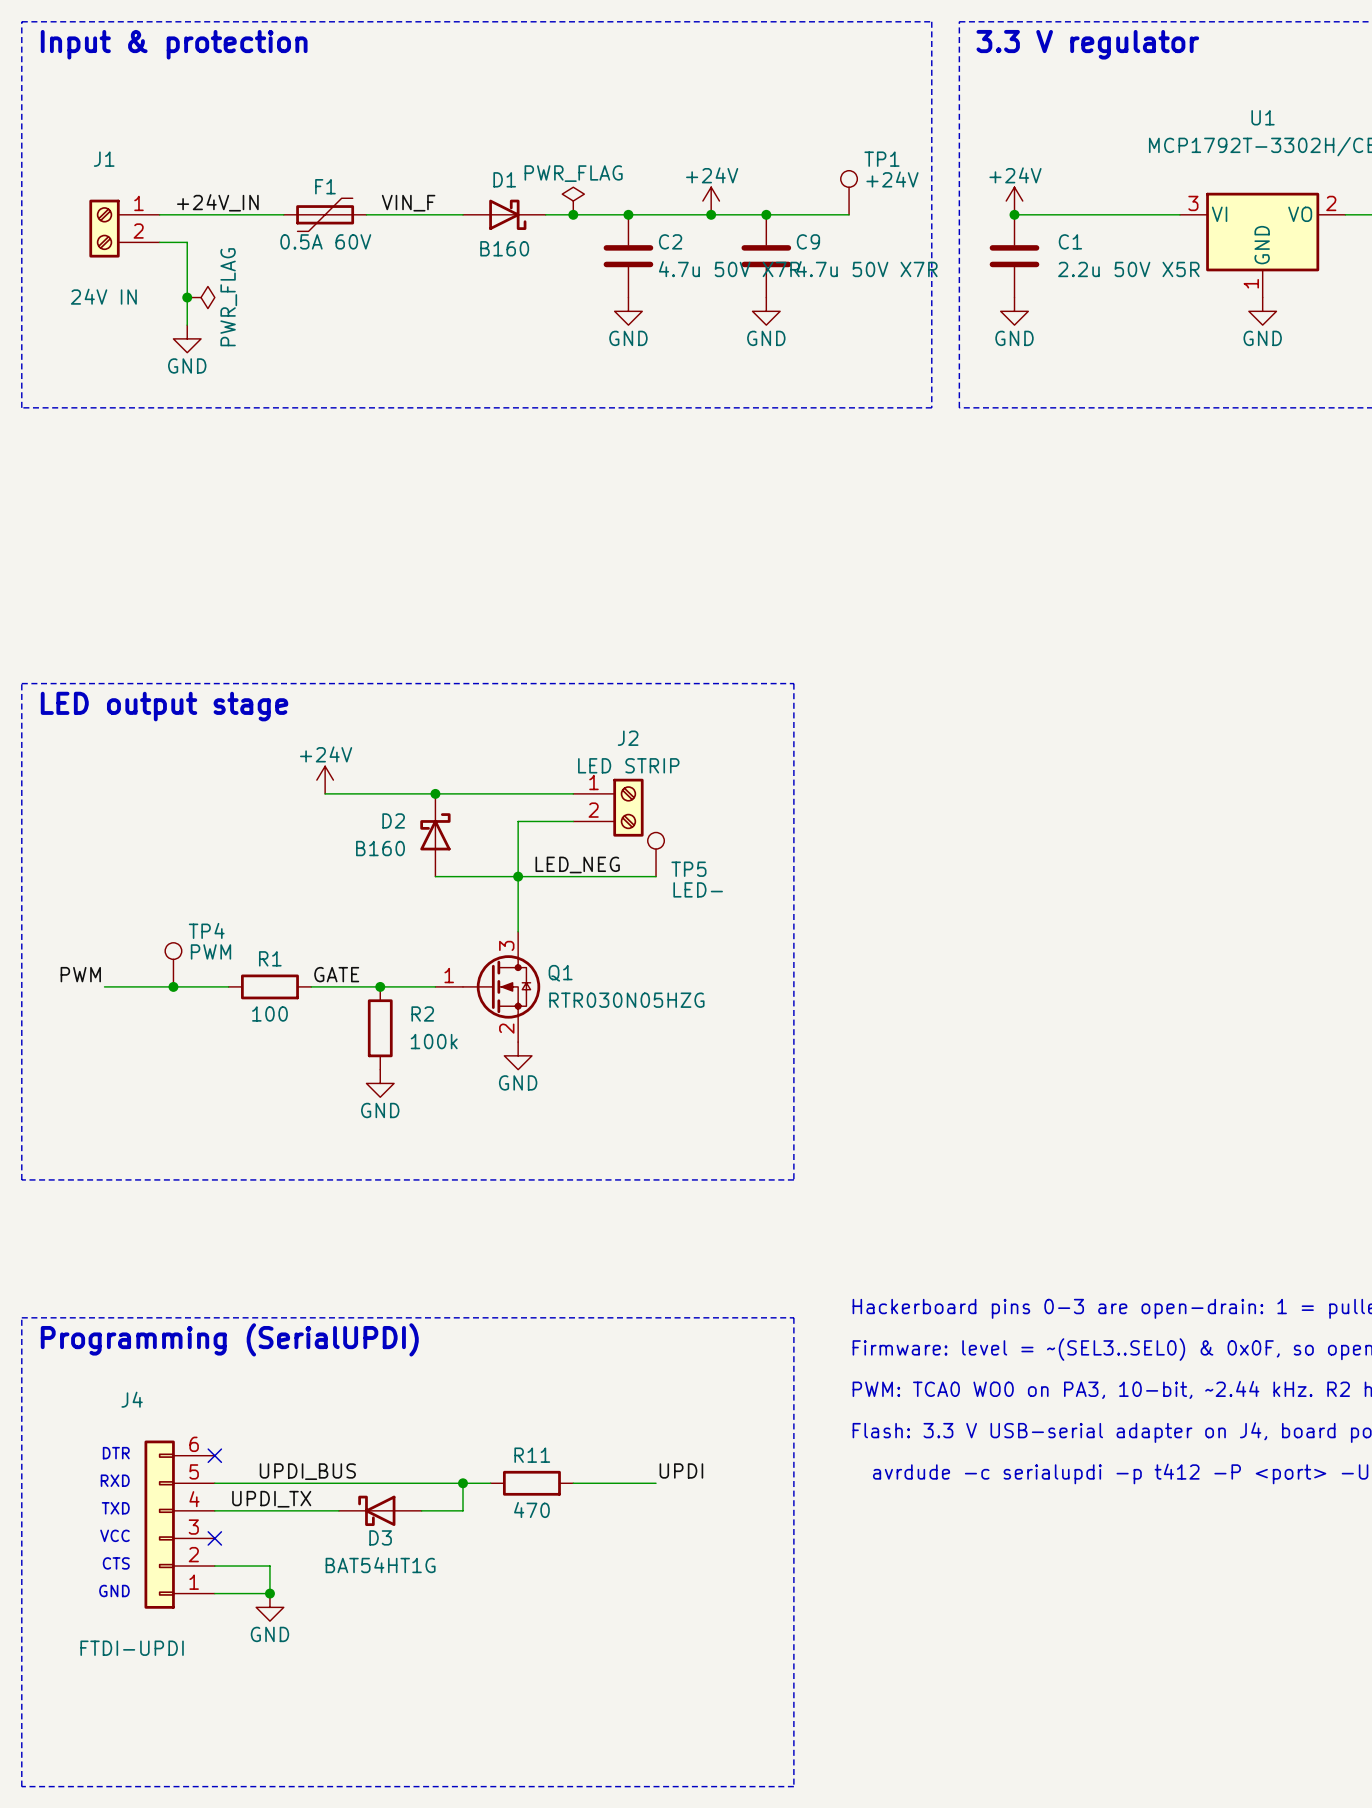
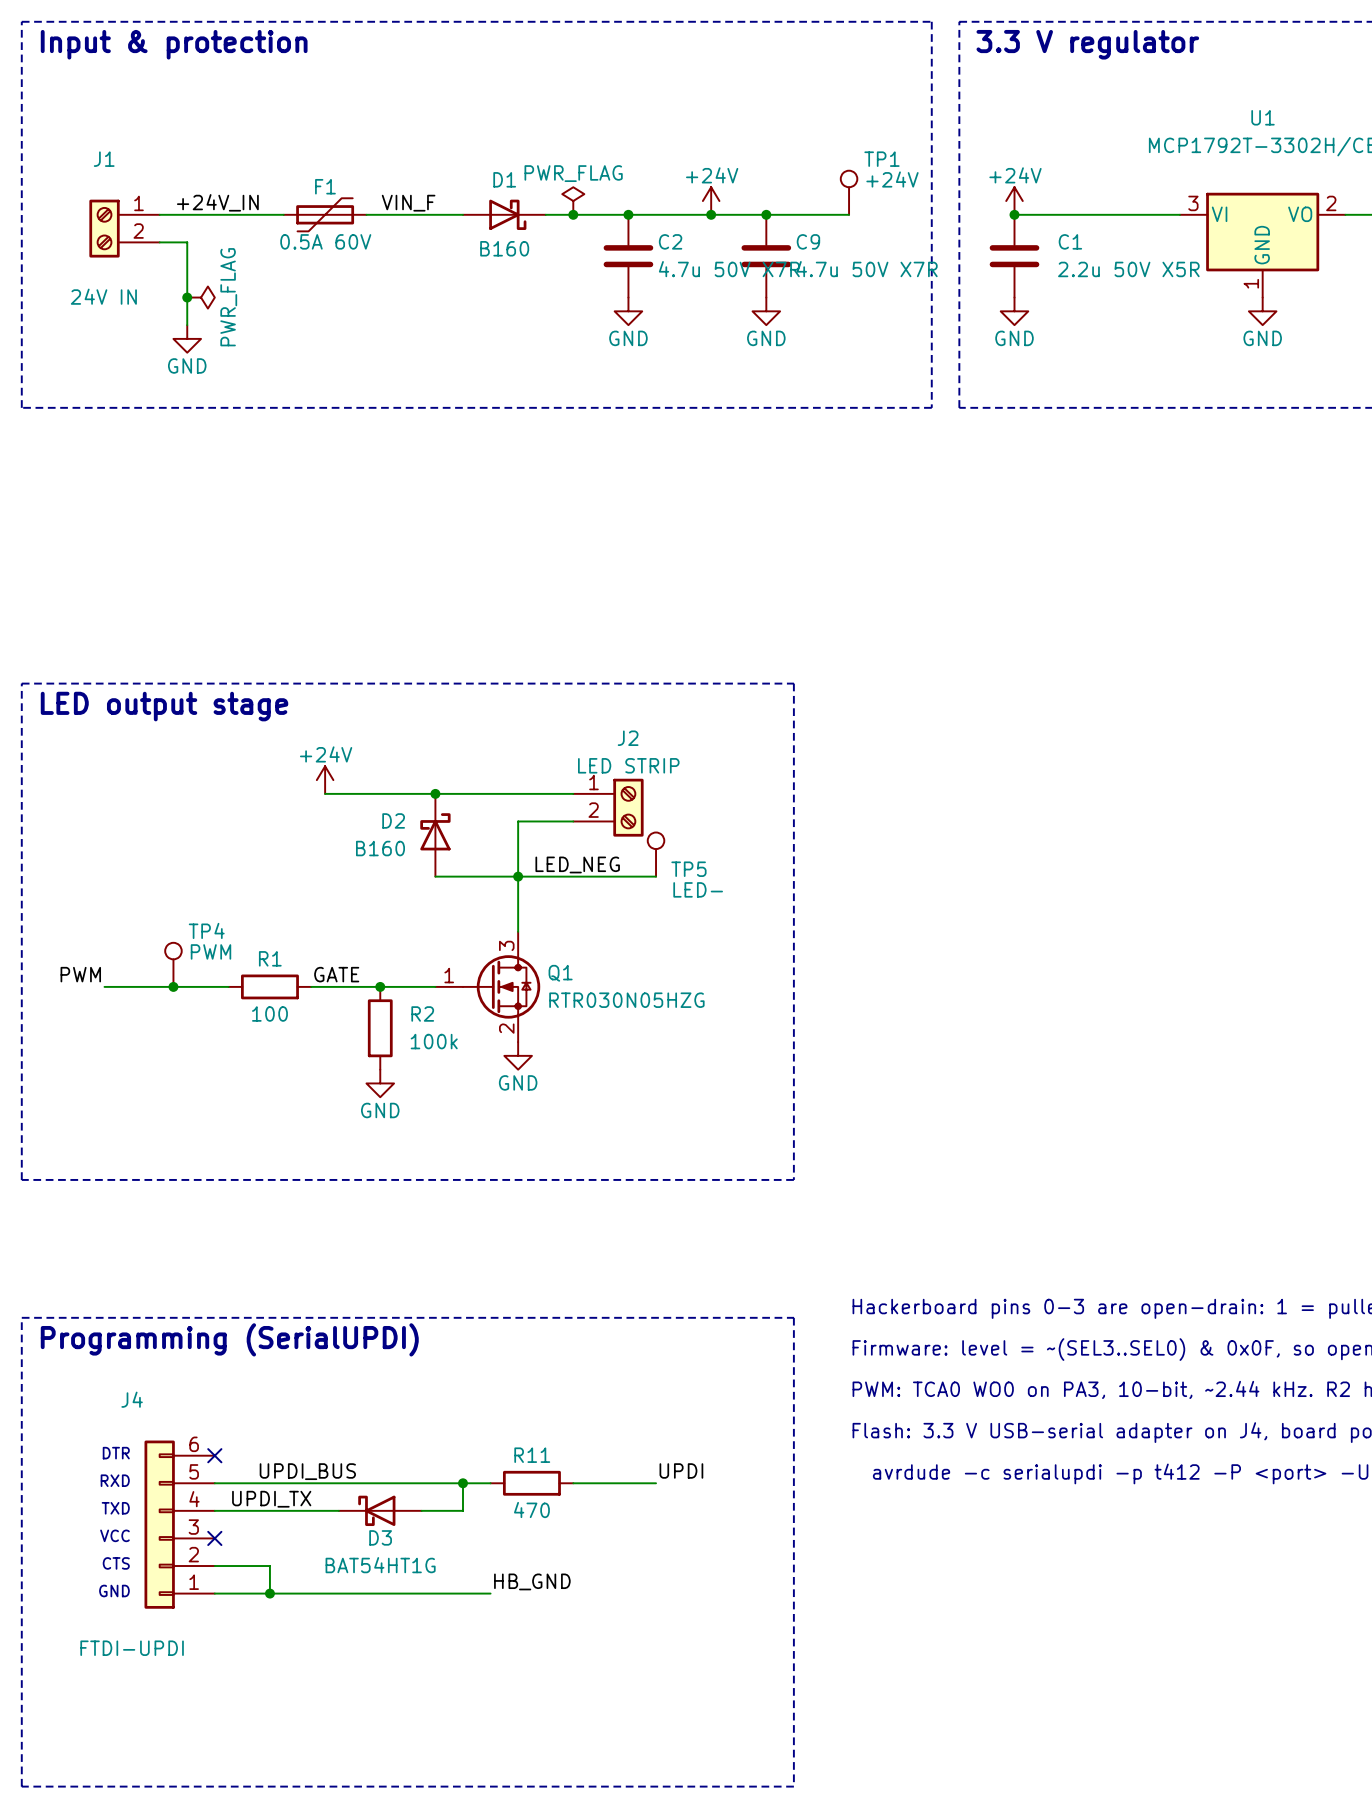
label: none -> HB_GND (532, 1581)
wire: none -> (269, 1593) (490, 1593)
power symbol: GND (269, 1607) -> none

